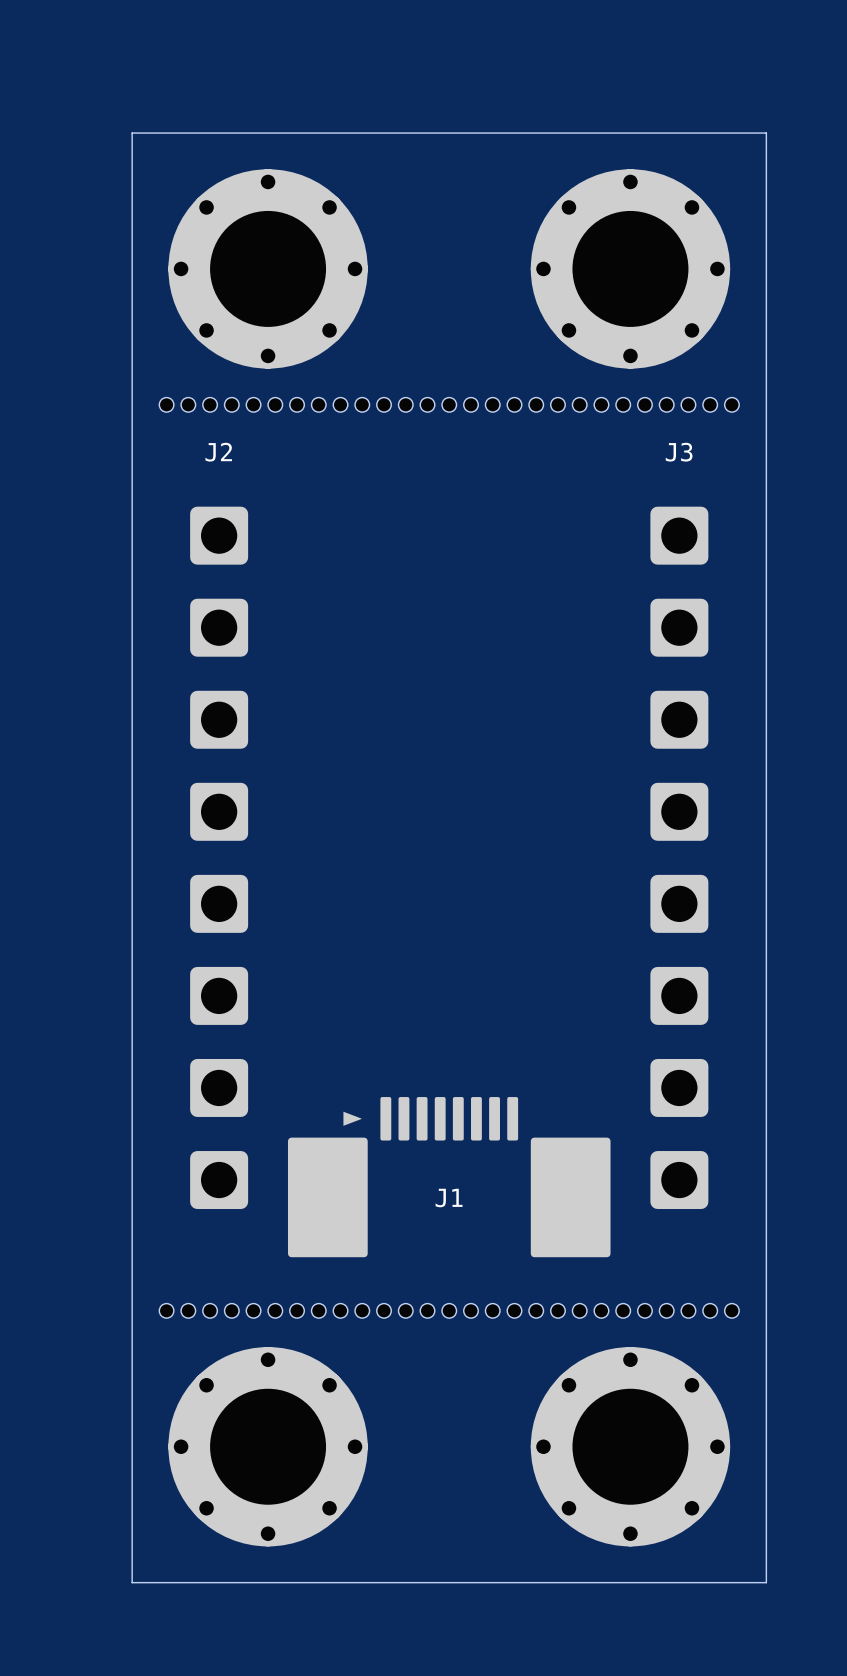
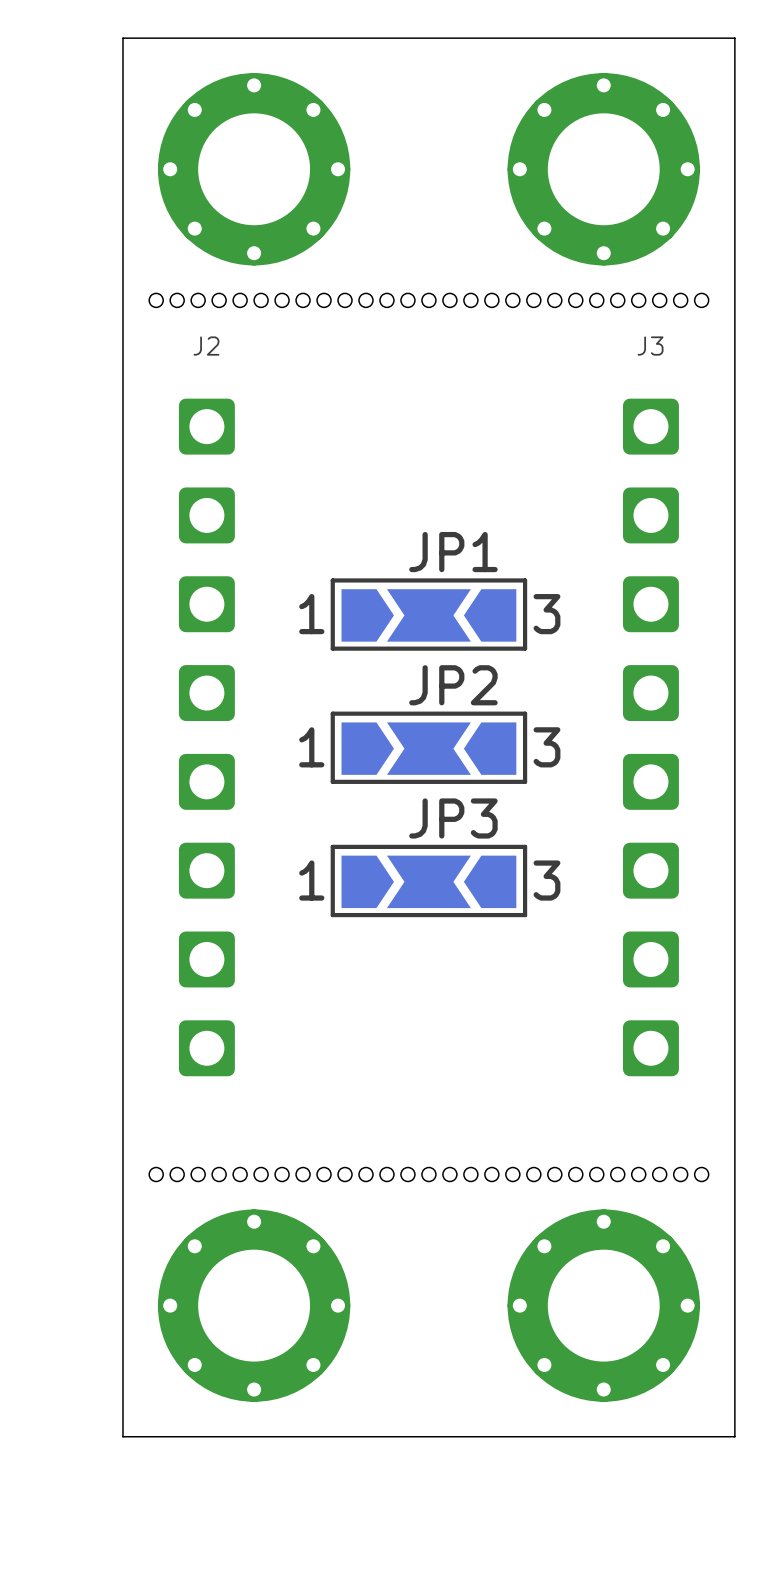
JP1: none -> (428, 614)
JP2: none -> (428, 747)
JP3: none -> (428, 880)
J1: (449, 1177) -> none

